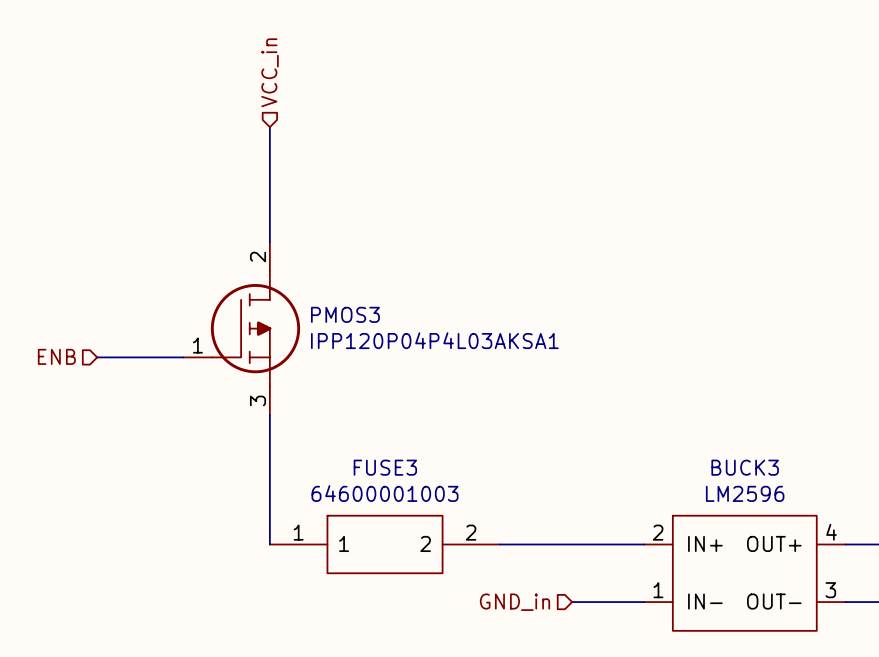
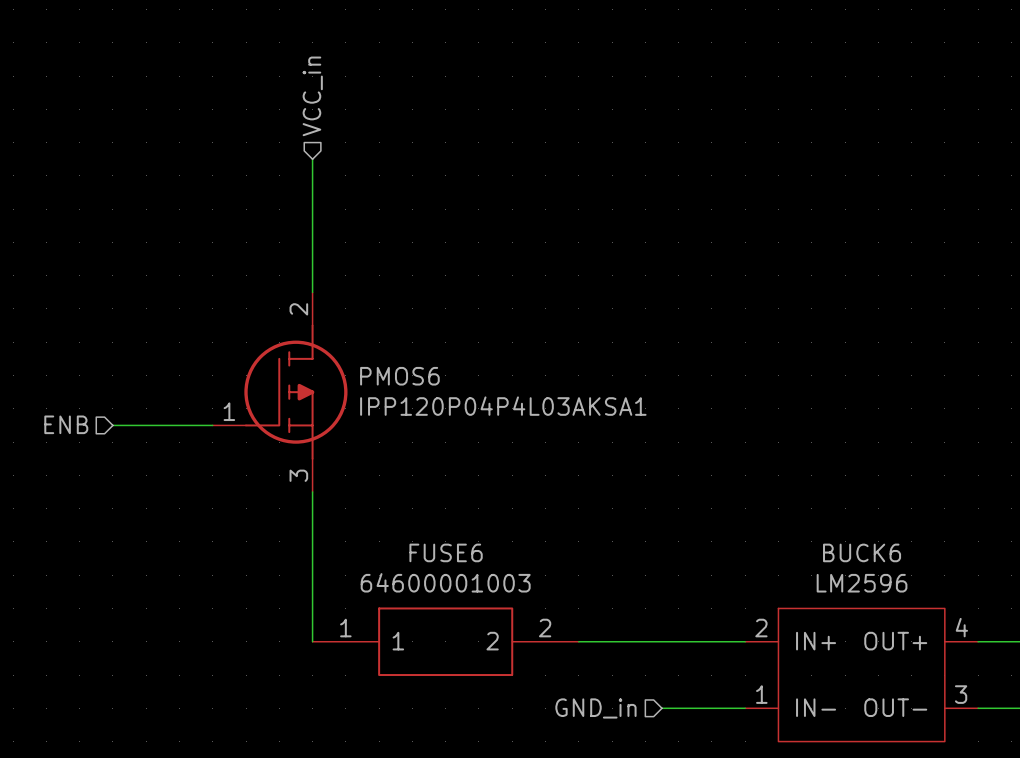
PMOS3 name: PMOS3 (345, 314) -> PMOS6 (399, 376)
FUSE3 name: FUSE3 (385, 467) -> FUSE6 (446, 552)
BUCK3 name: BUCK3 (745, 467) -> BUCK6 (862, 552)

